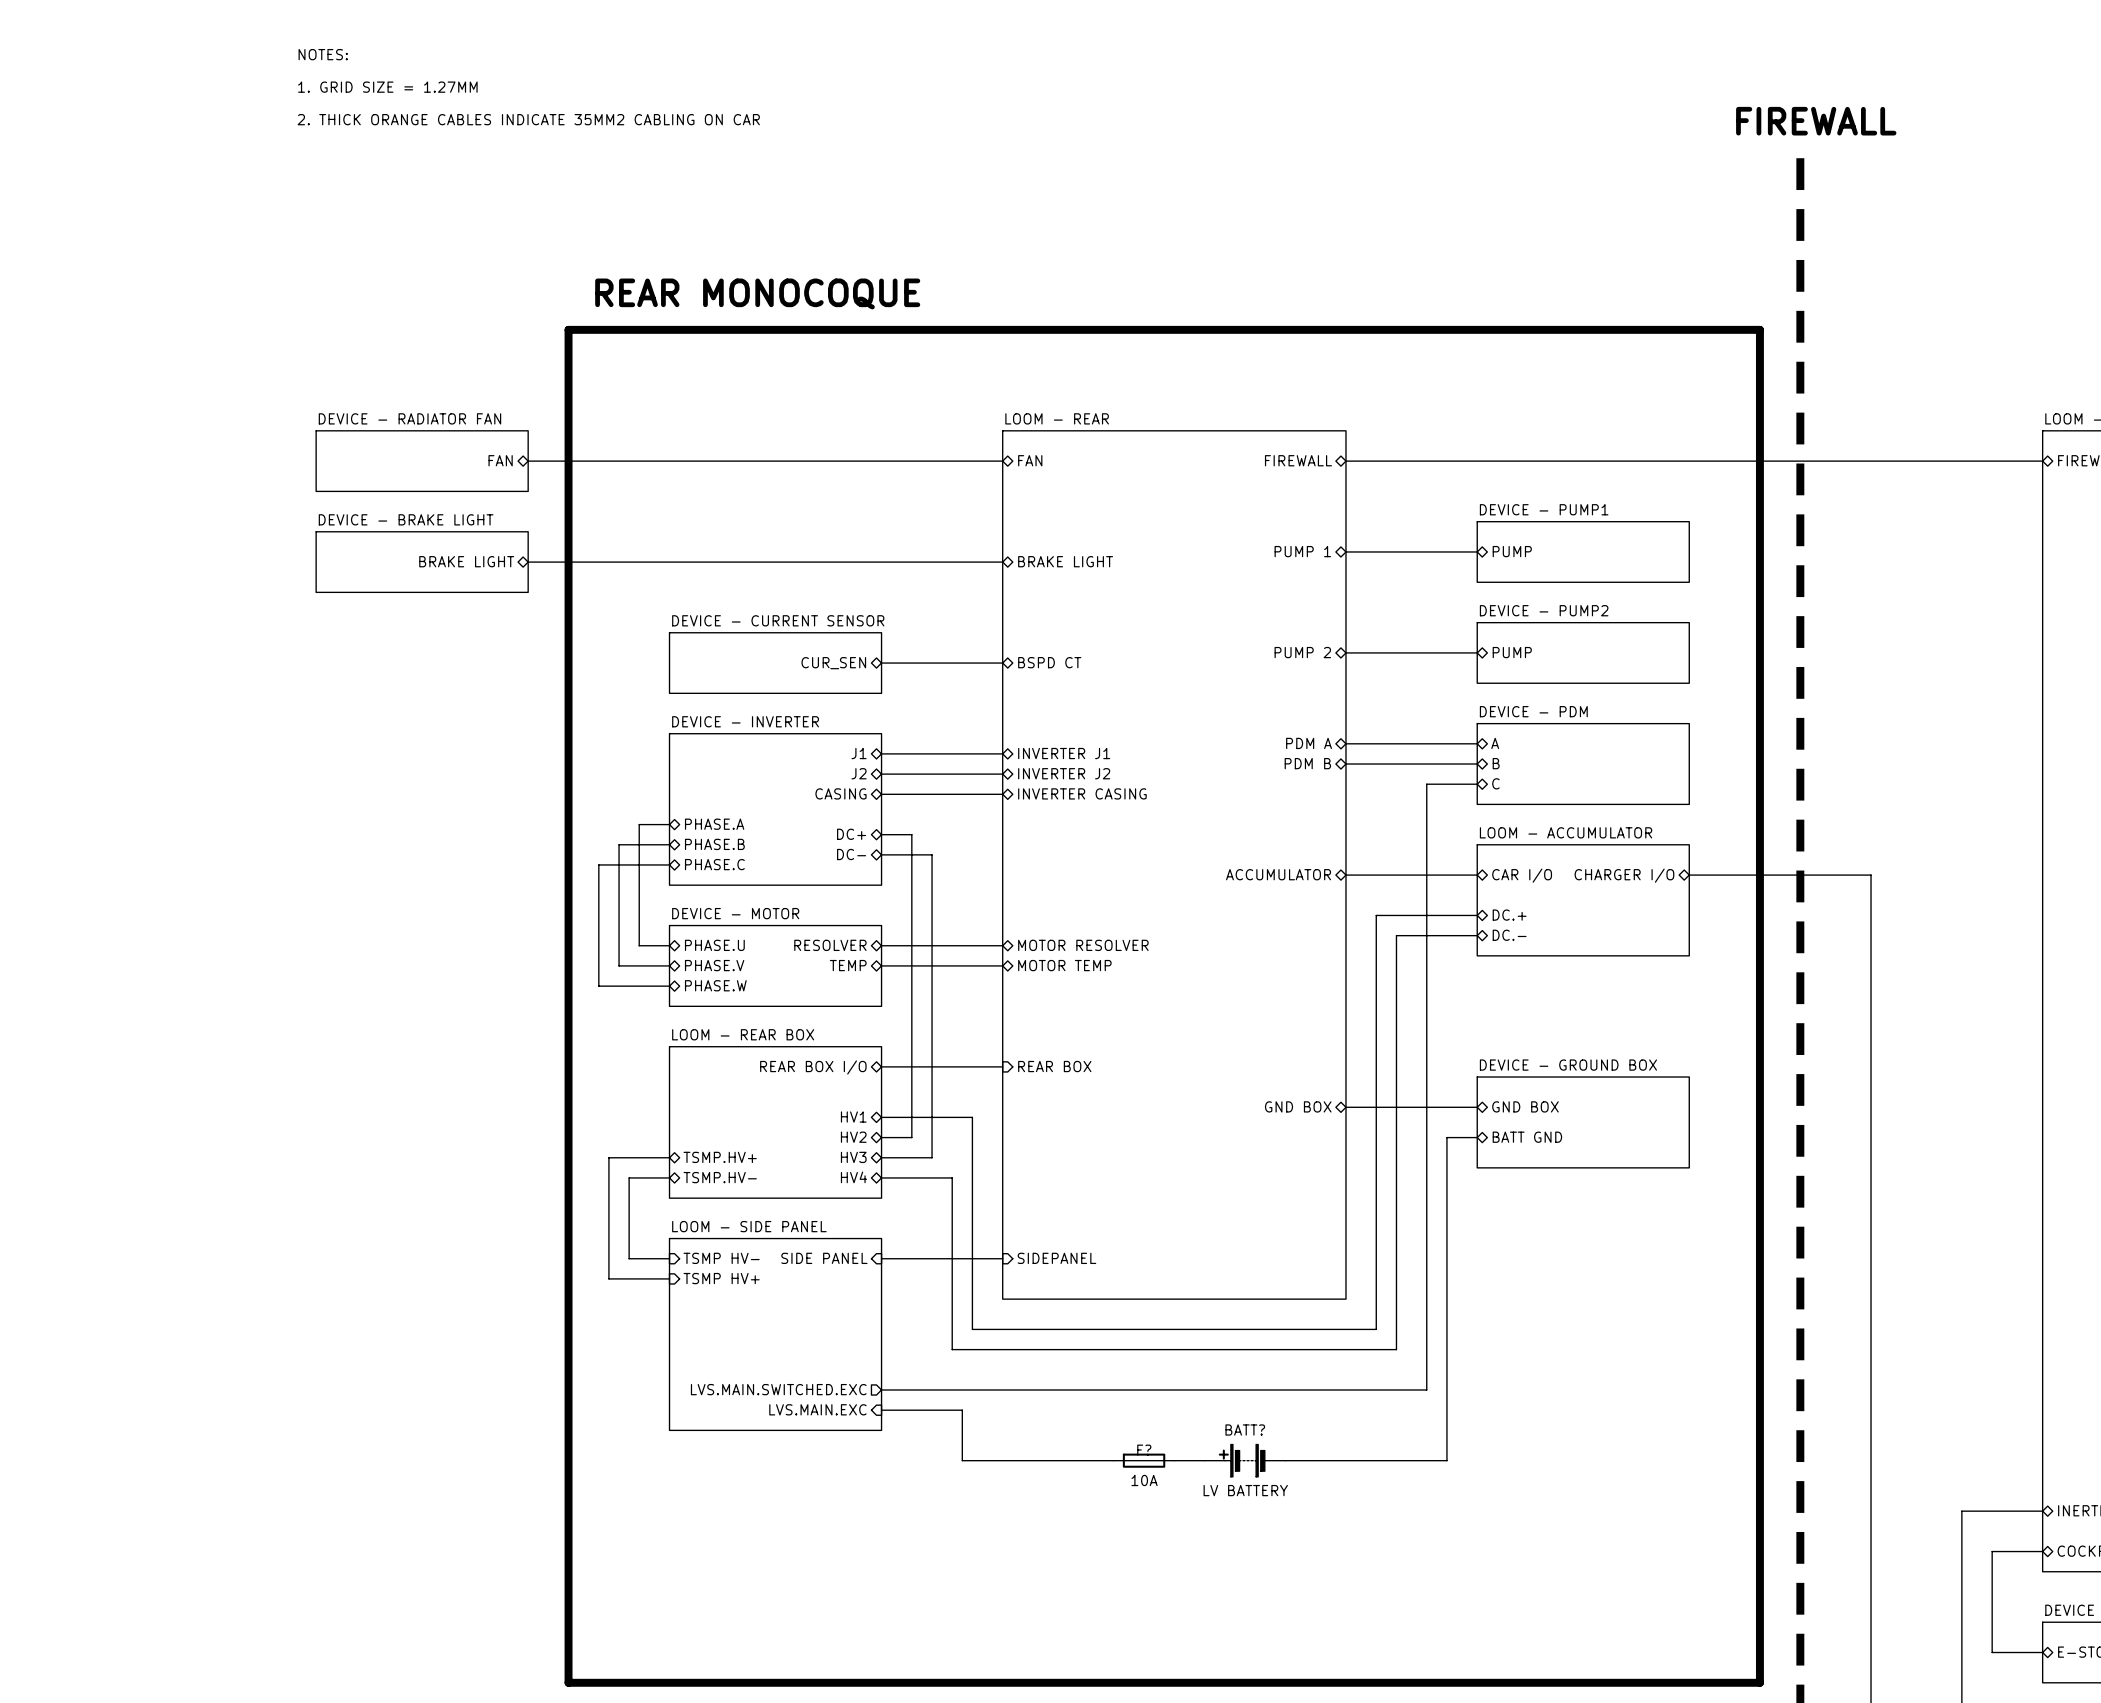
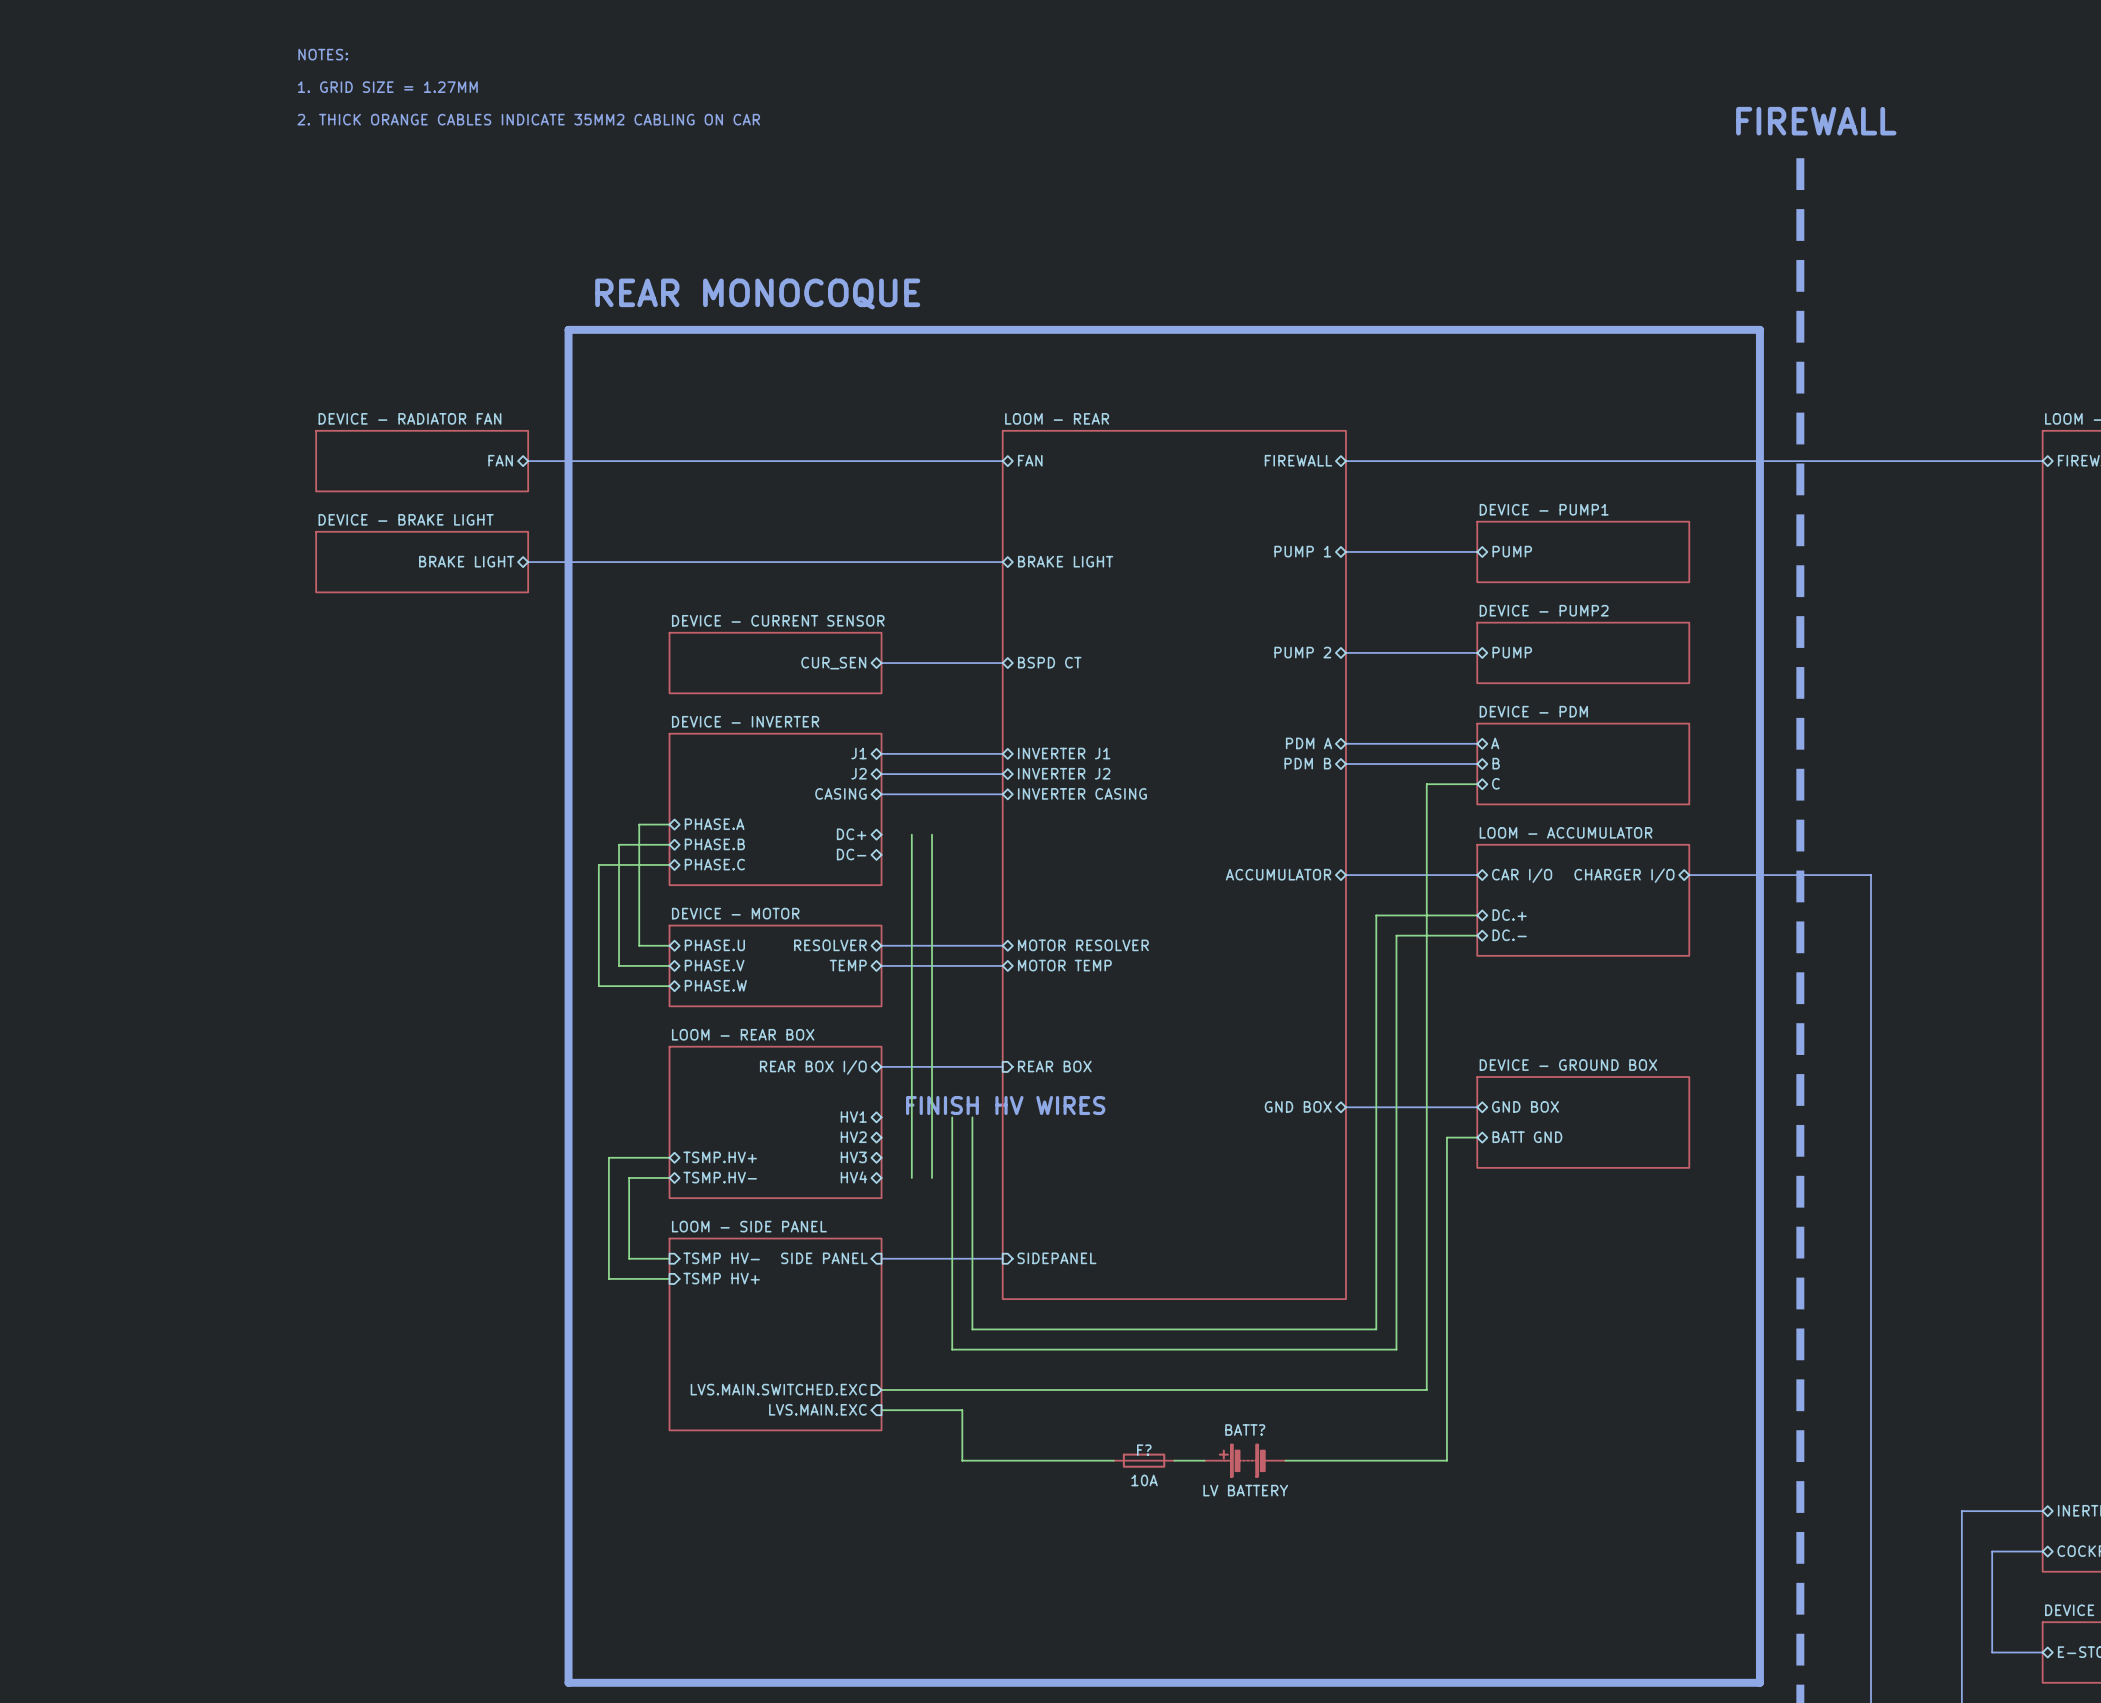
wire: (881, 834) (911, 834) -> none
wire: (881, 854) (932, 854) -> (932, 834) (932, 854)
text: none -> FINISH HV WIRES (1005, 1105)
wire: (881, 1117) (972, 1117) -> none
wire: (881, 1137) (911, 1137) -> (911, 1177) (911, 1137)
wire: (881, 1157) (932, 1157) -> (932, 1177) (932, 1157)
wire: (881, 1177) (952, 1177) -> (952, 1117) (952, 1177)

